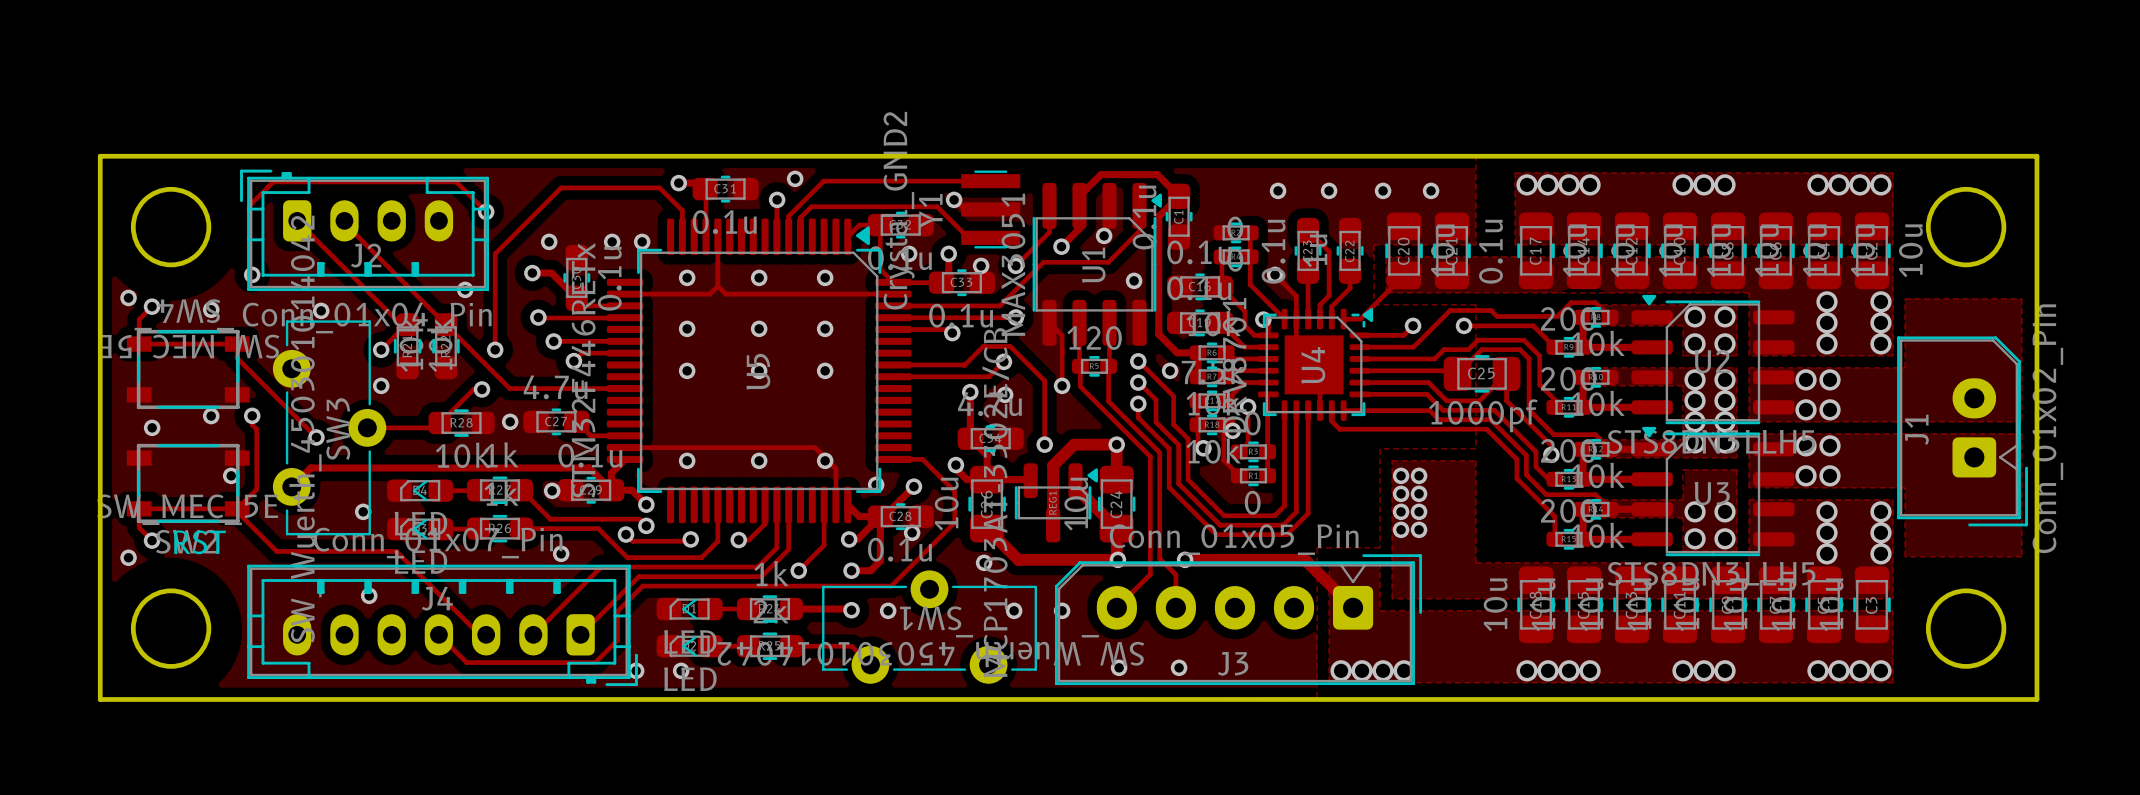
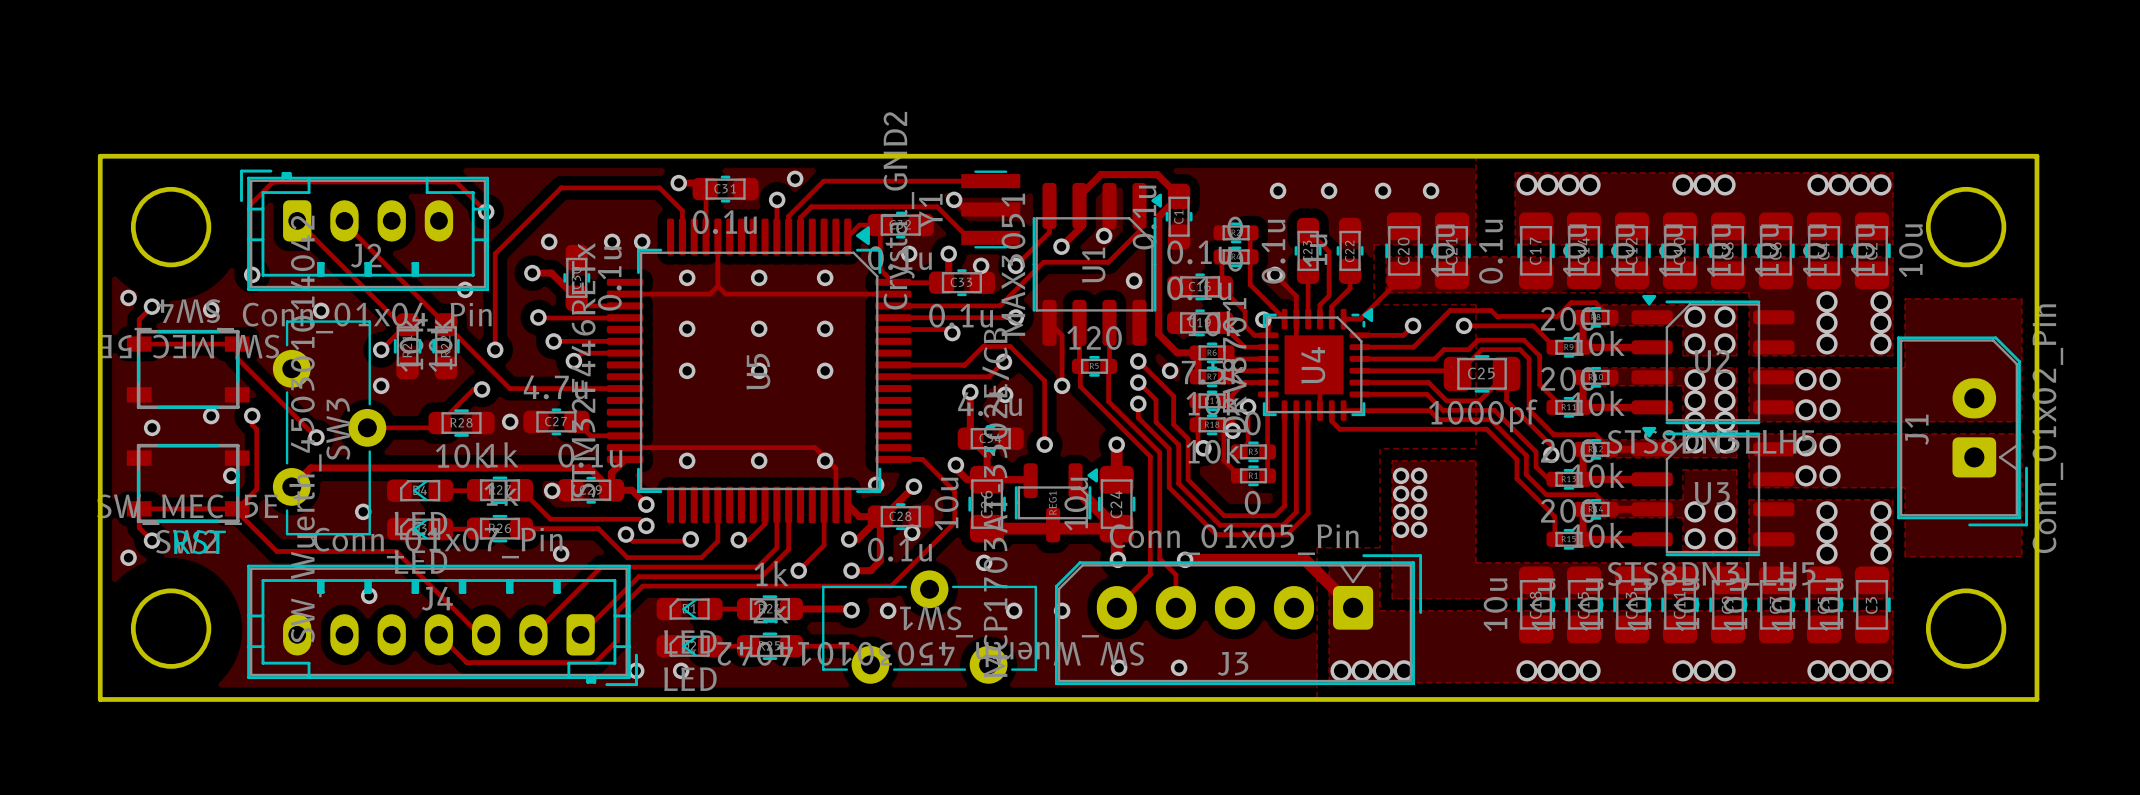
track: (1116, 444) (1074, 444) (1053, 465) (1053, 524) -> none
track: (987, 528) (1018, 559) (1117, 559) -> (987, 528) (1116, 528)

